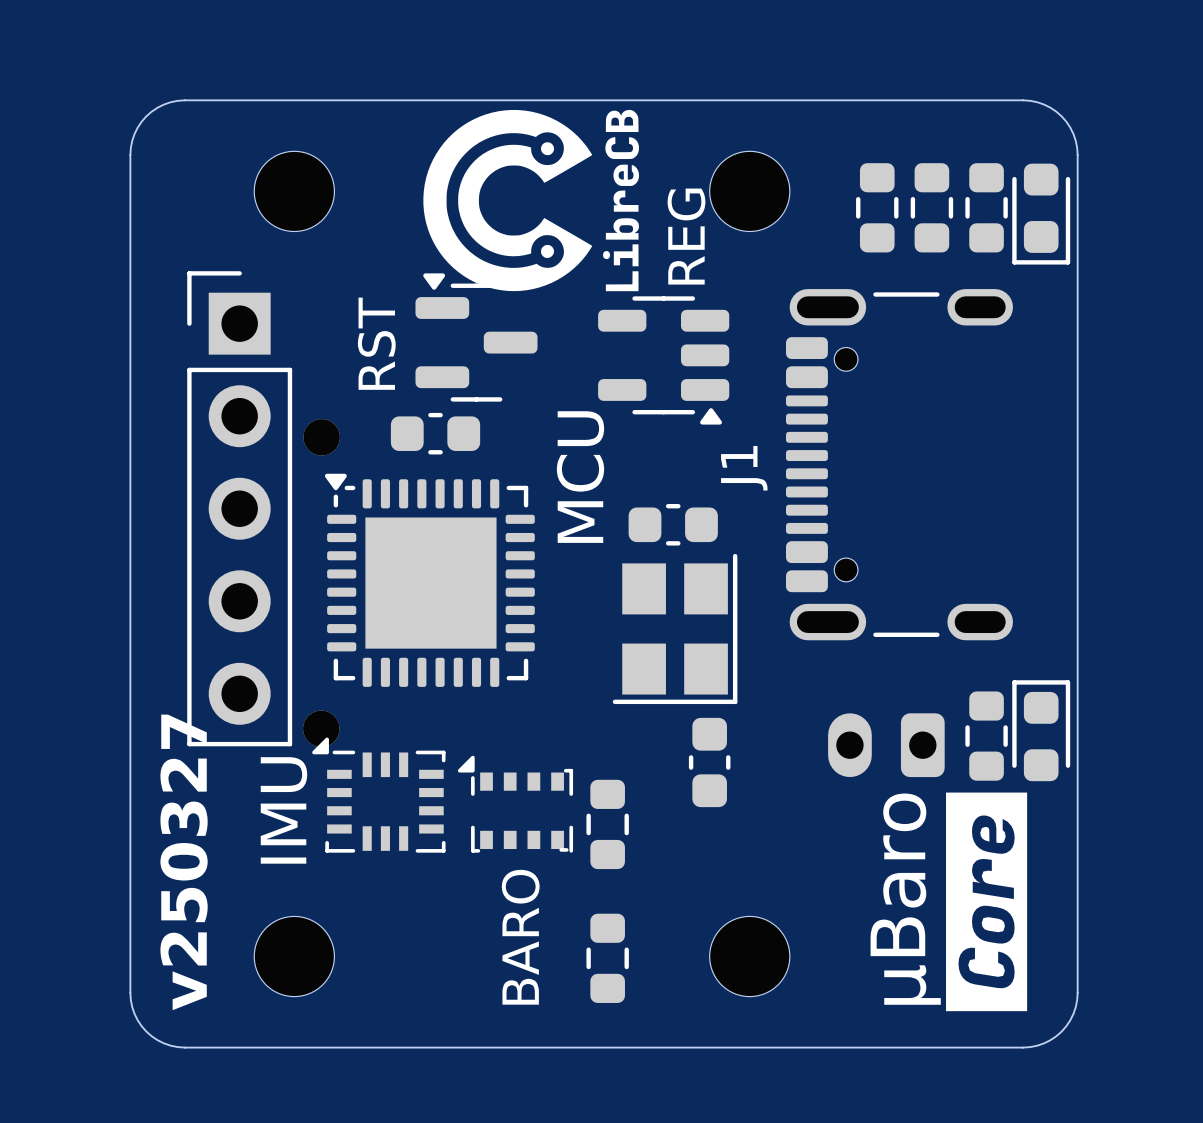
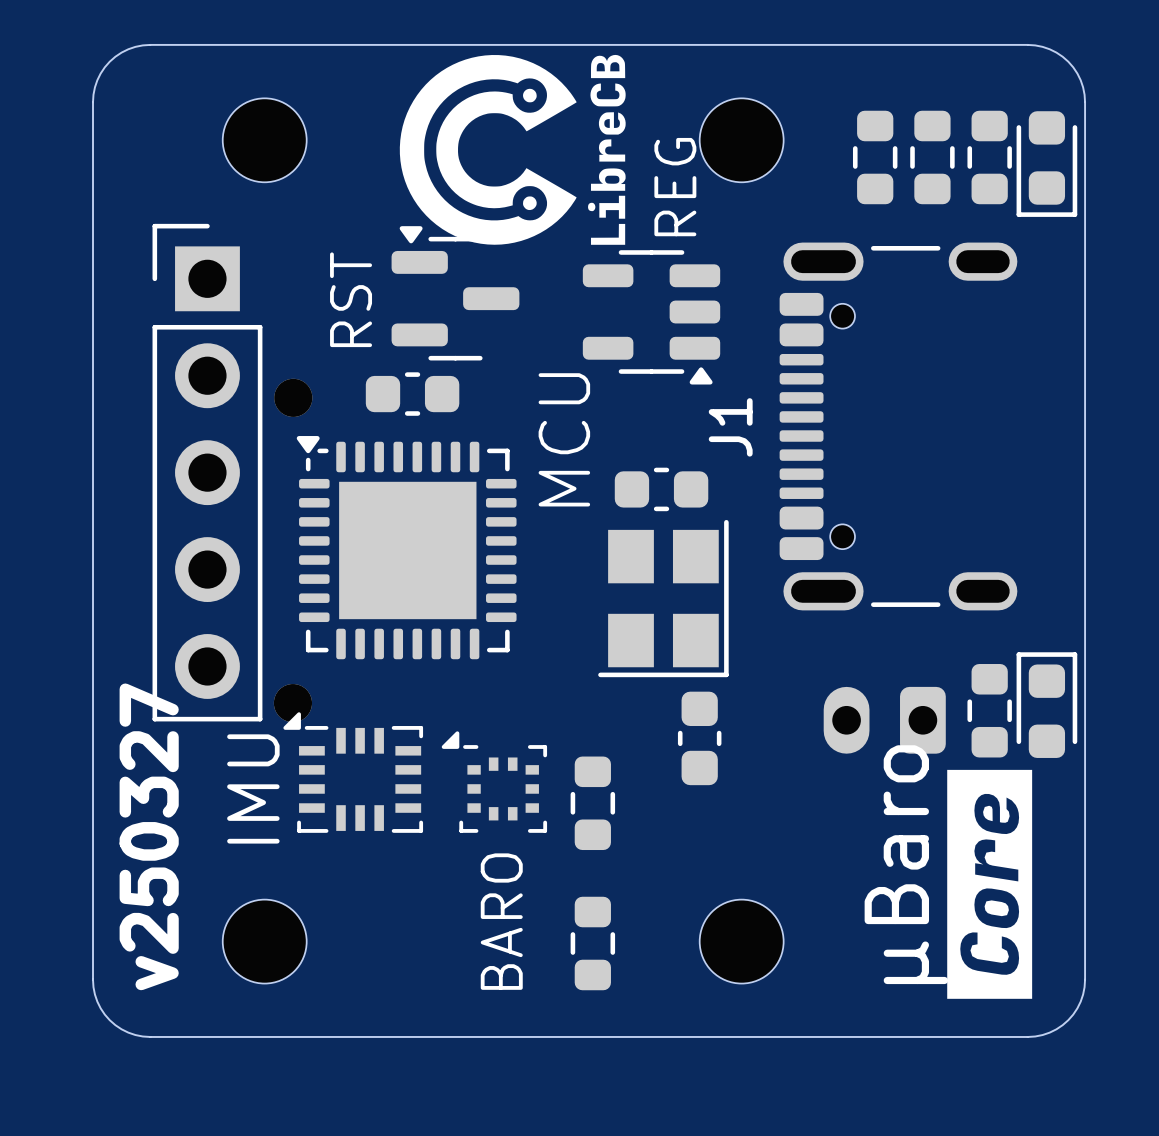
part footprint: [457, 755, 574, 853] -> [441, 731, 548, 833]

